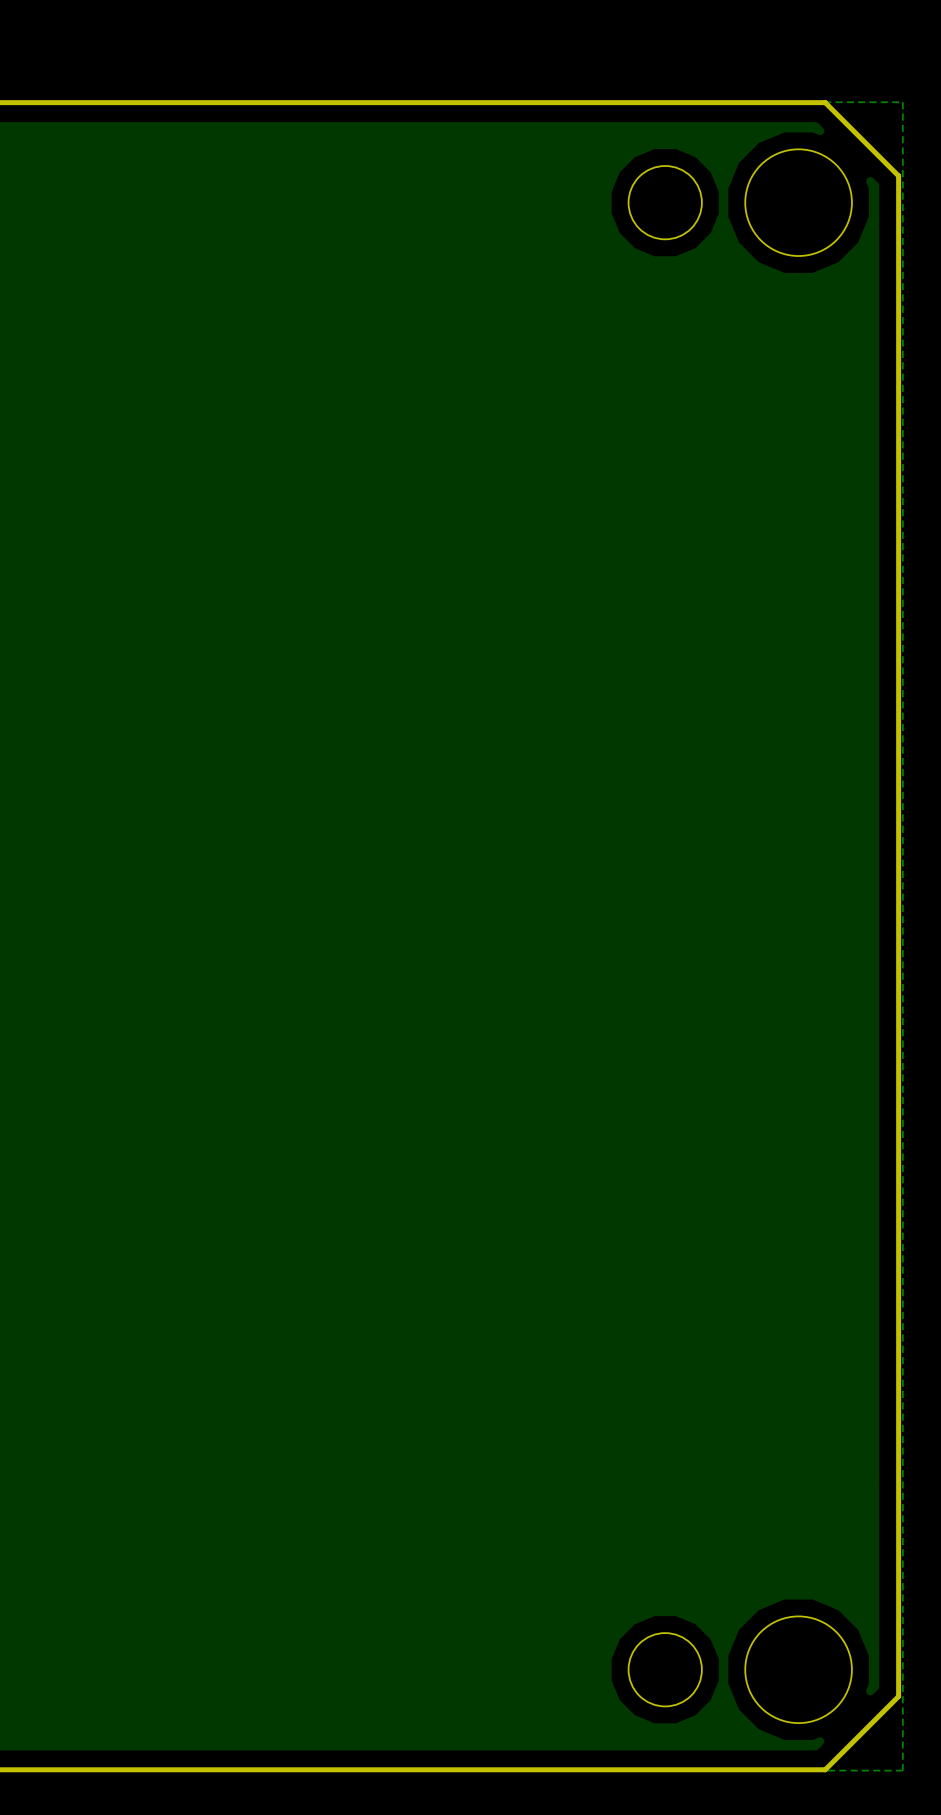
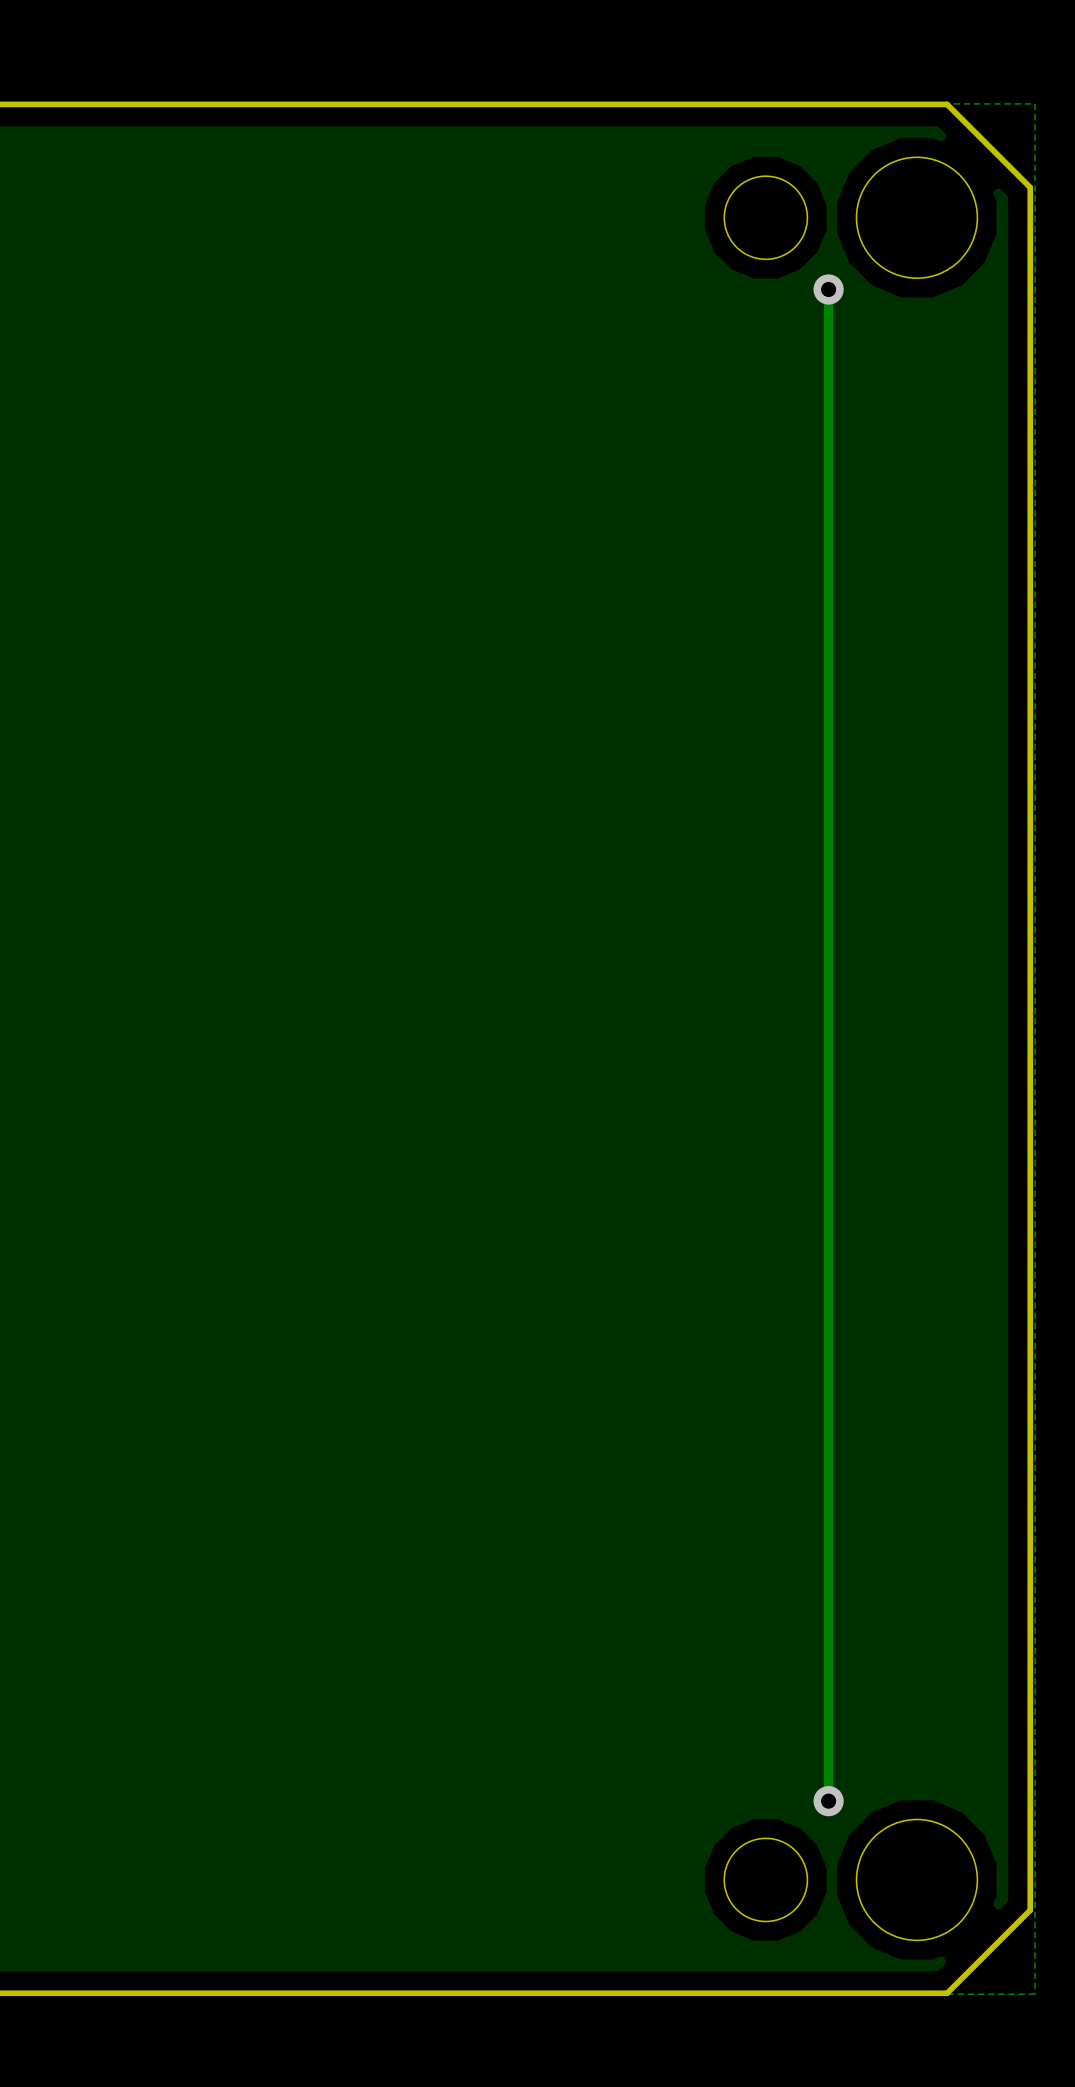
track: none -> (828, 289) (828, 1801)
via: none -> (828, 289)
via: none -> (828, 1801)

